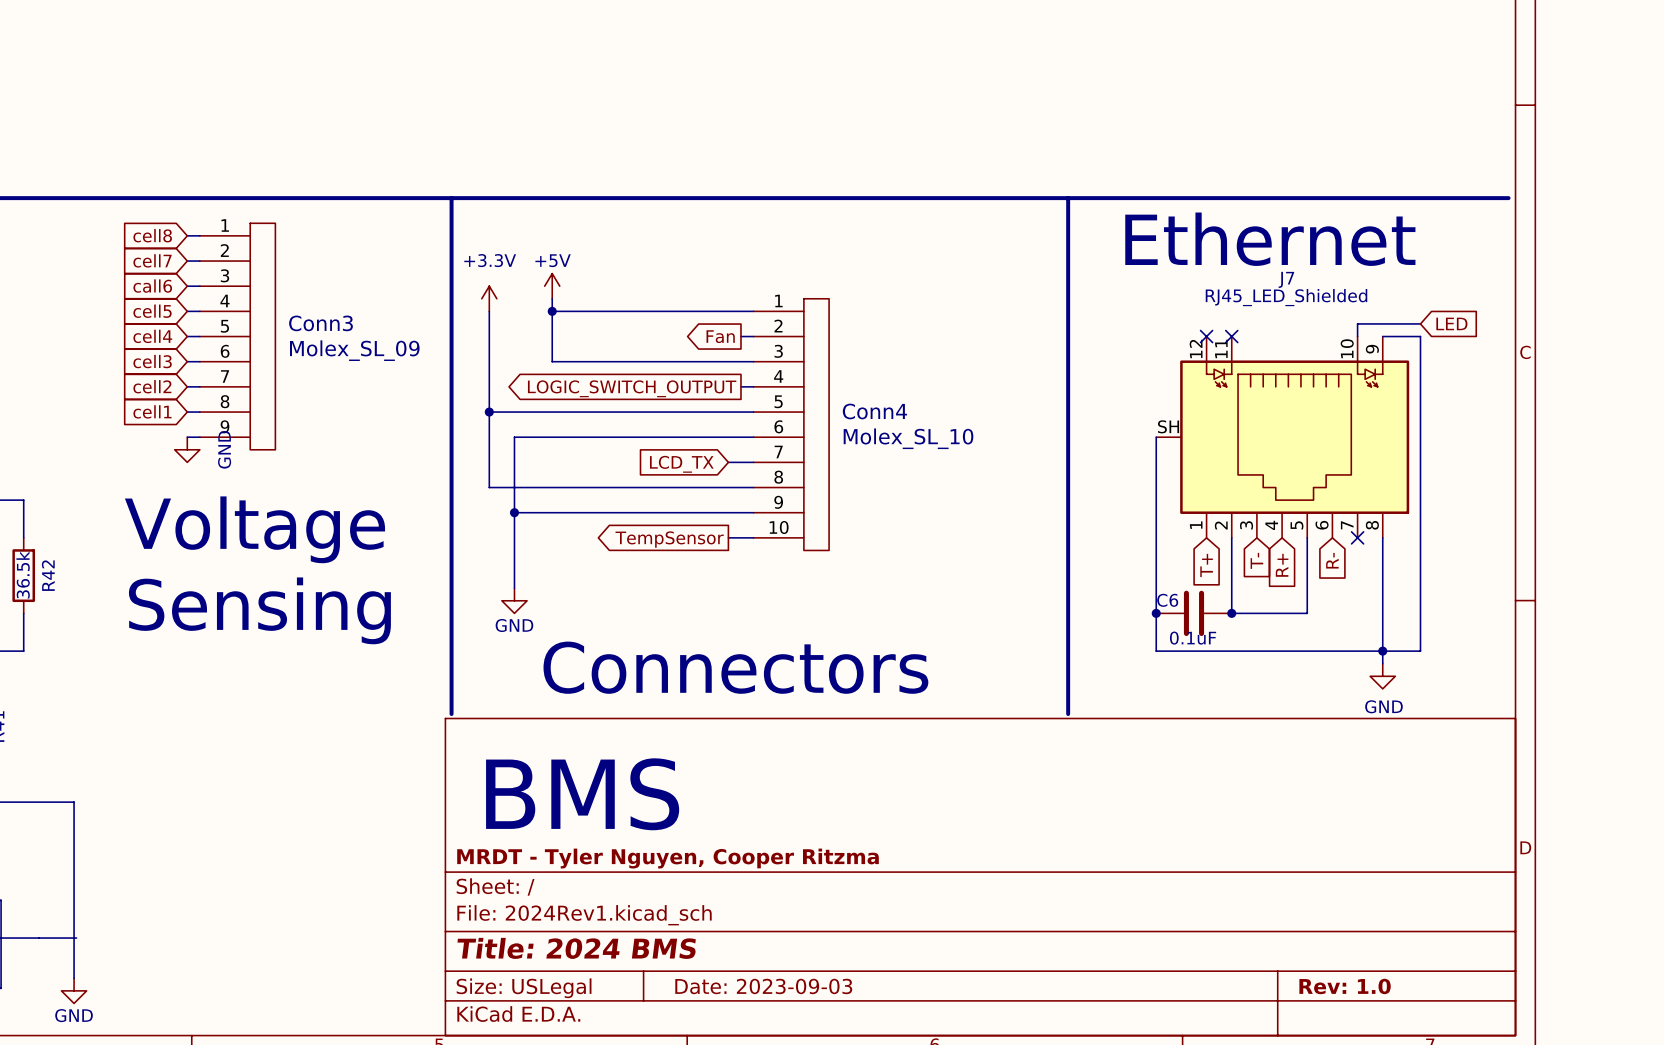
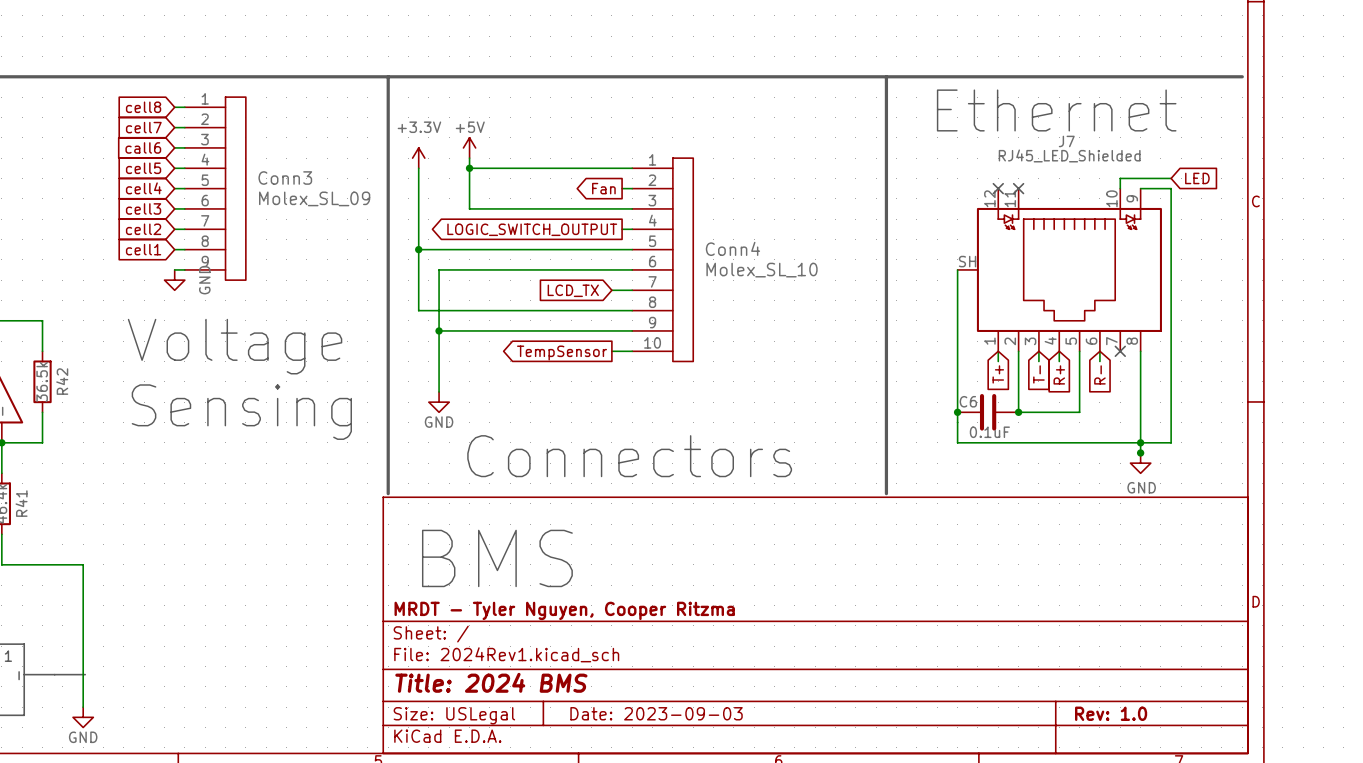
wire: none -> (998, 351) (998, 361)
wire: none -> (1038, 351) (1038, 361)
wire: none -> (1059, 351) (1059, 361)
wire: none -> (1099, 351) (1099, 361)
junction: none -> (1140, 452)

